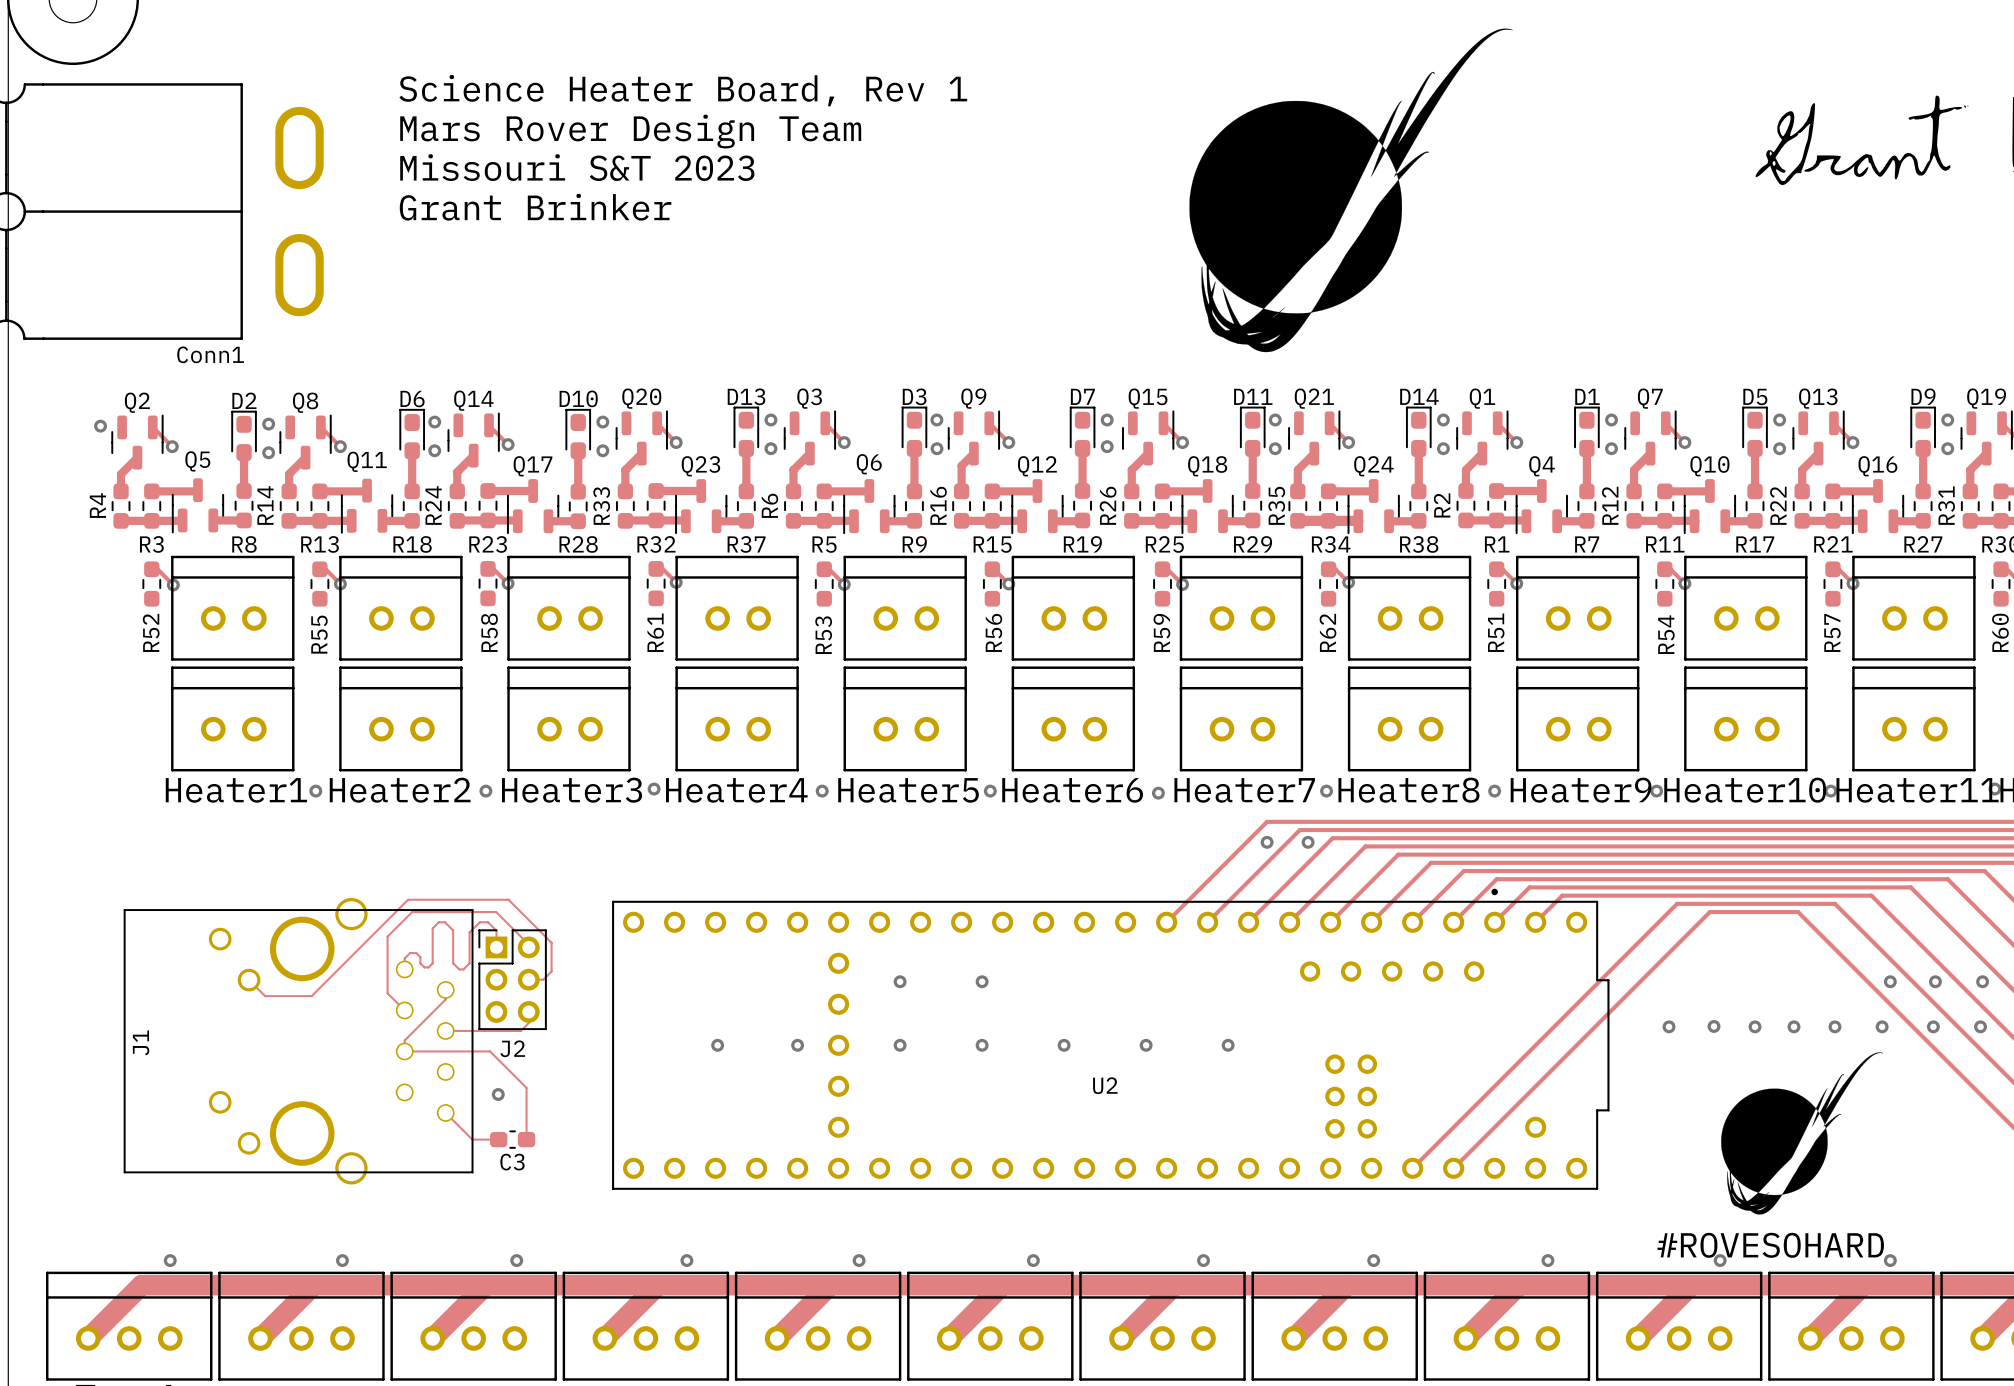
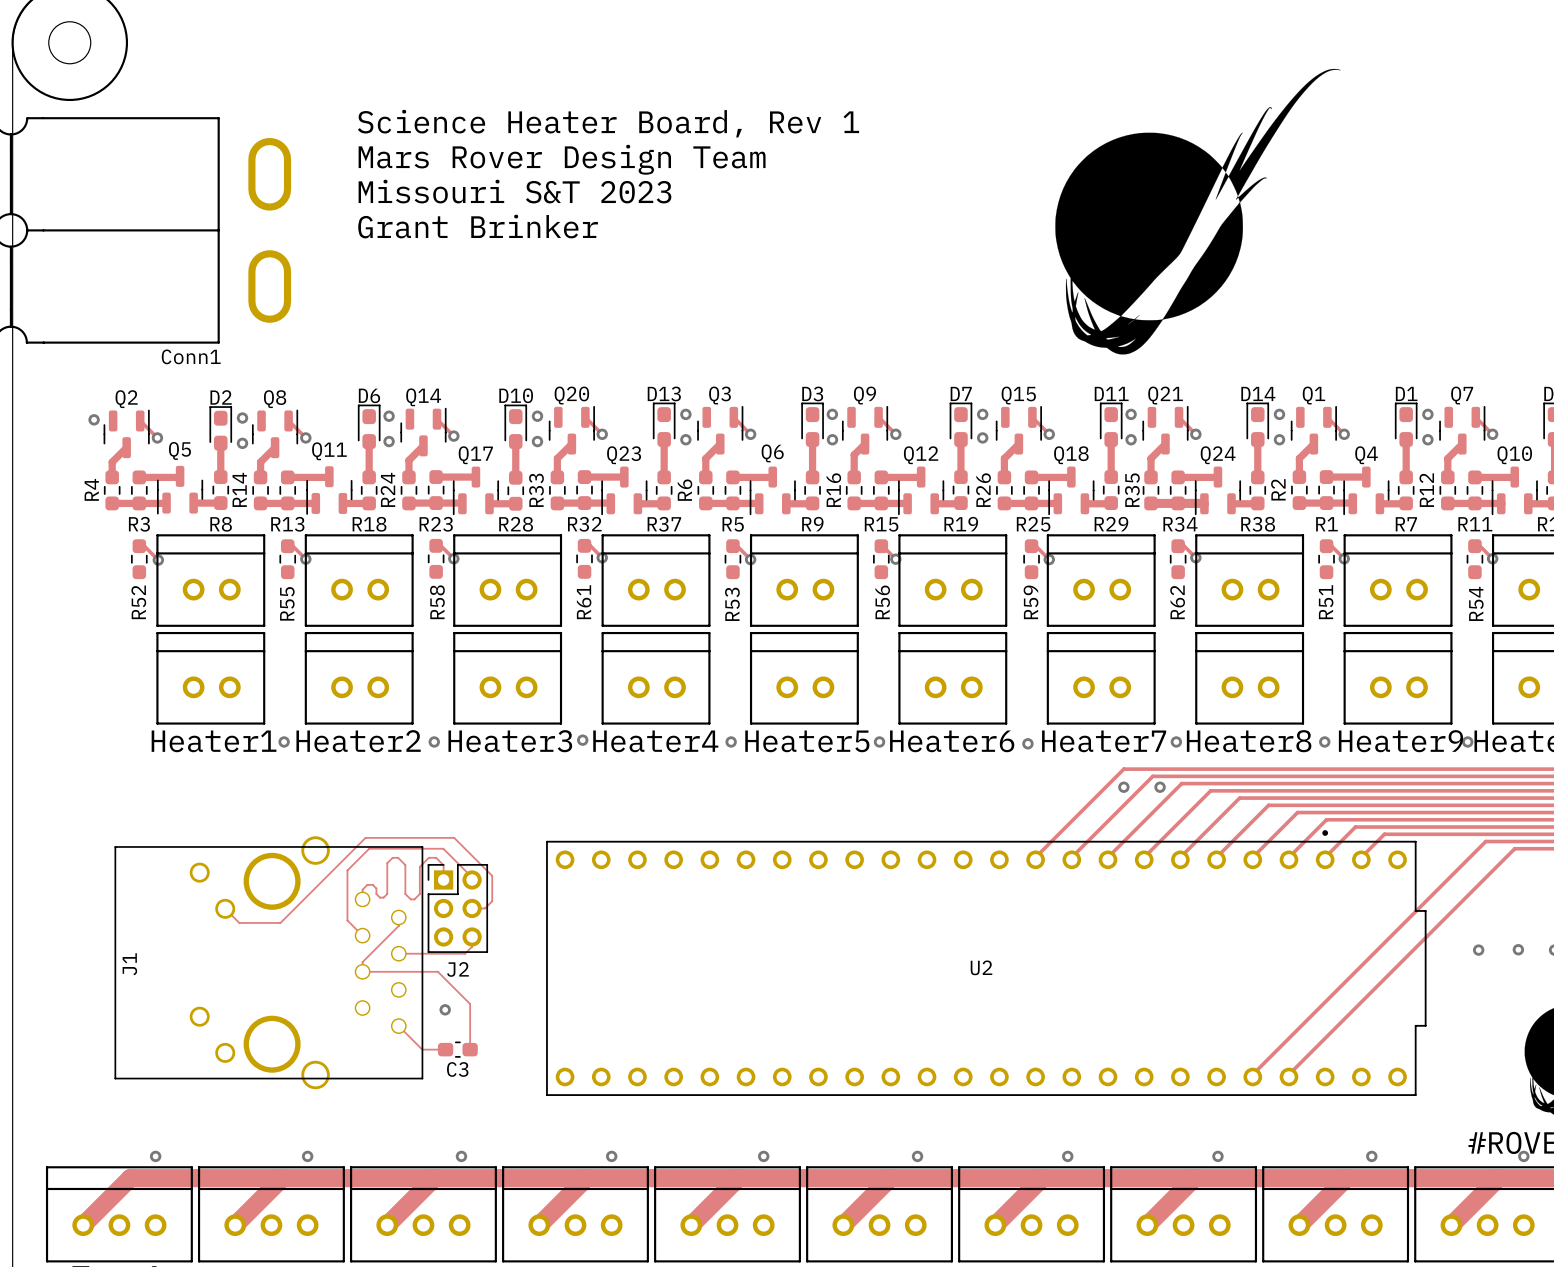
U2 footprint: [612, 888, 1610, 1190] -> [546, 830, 1427, 1096]
via: (900, 981) -> none
via: (982, 981) -> none
via: (717, 1045) -> none
via: (797, 1045) -> none
via: (900, 1045) -> none
via: (982, 1045) -> none
via: (1064, 1045) -> none
via: (1146, 1045) -> none
via: (1228, 1045) -> none
U2 name position: U2 (1105, 1085) -> U2 (981, 967)

